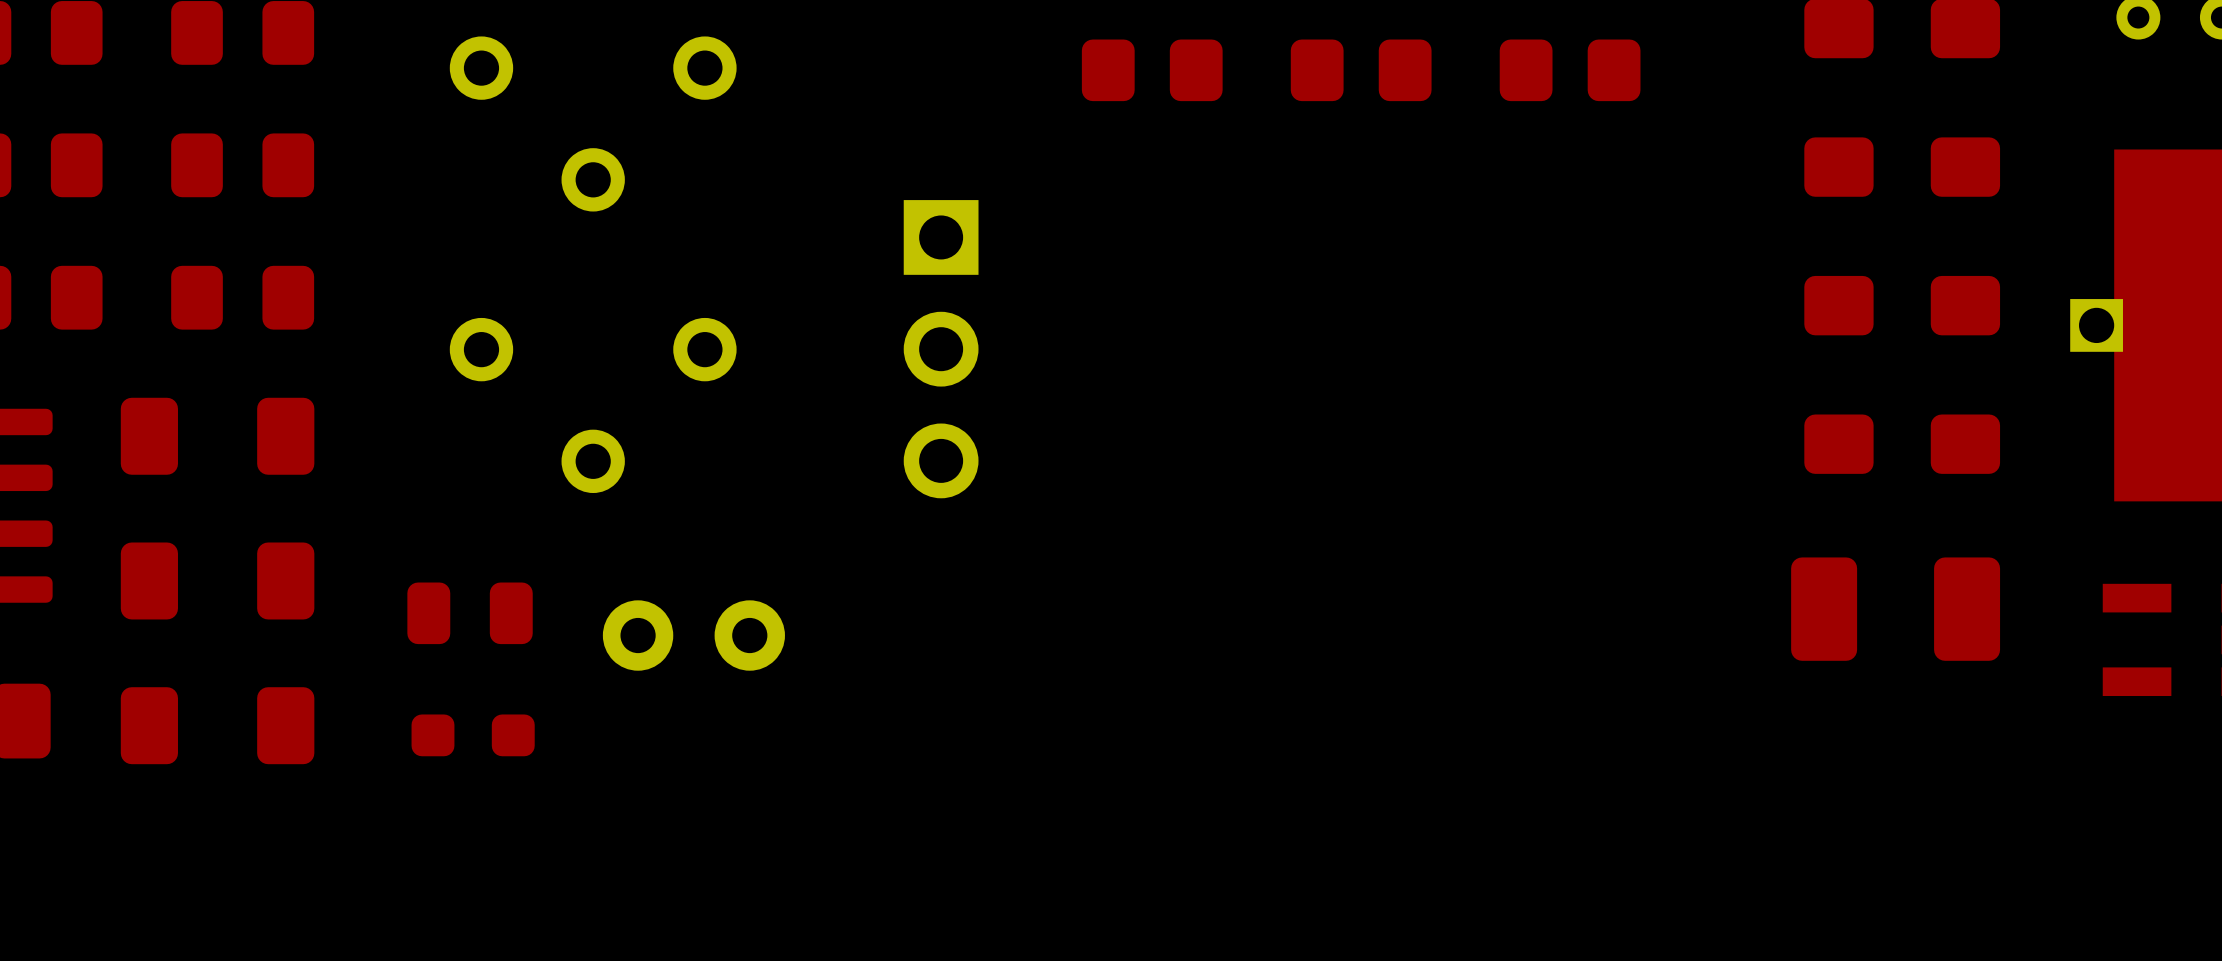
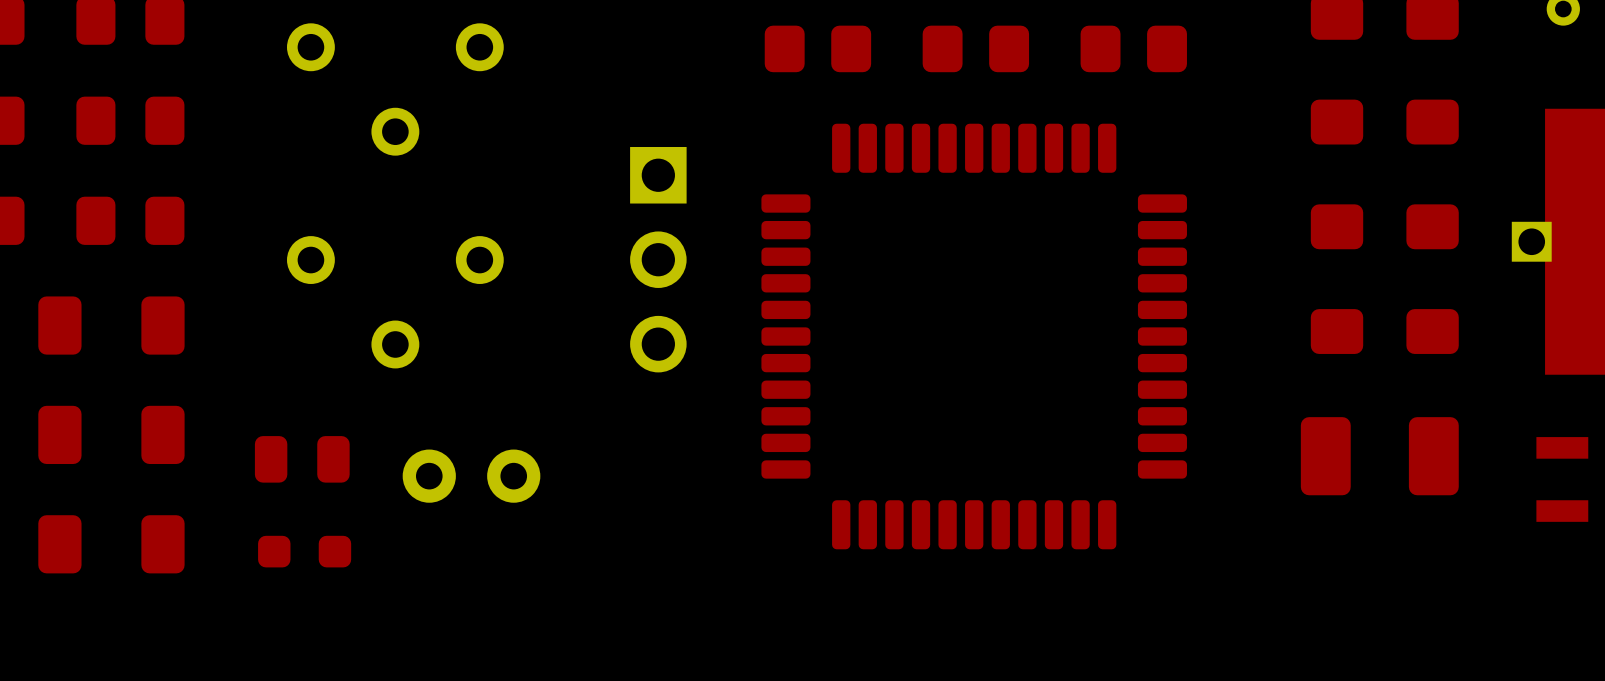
part: none -> (974, 336)

